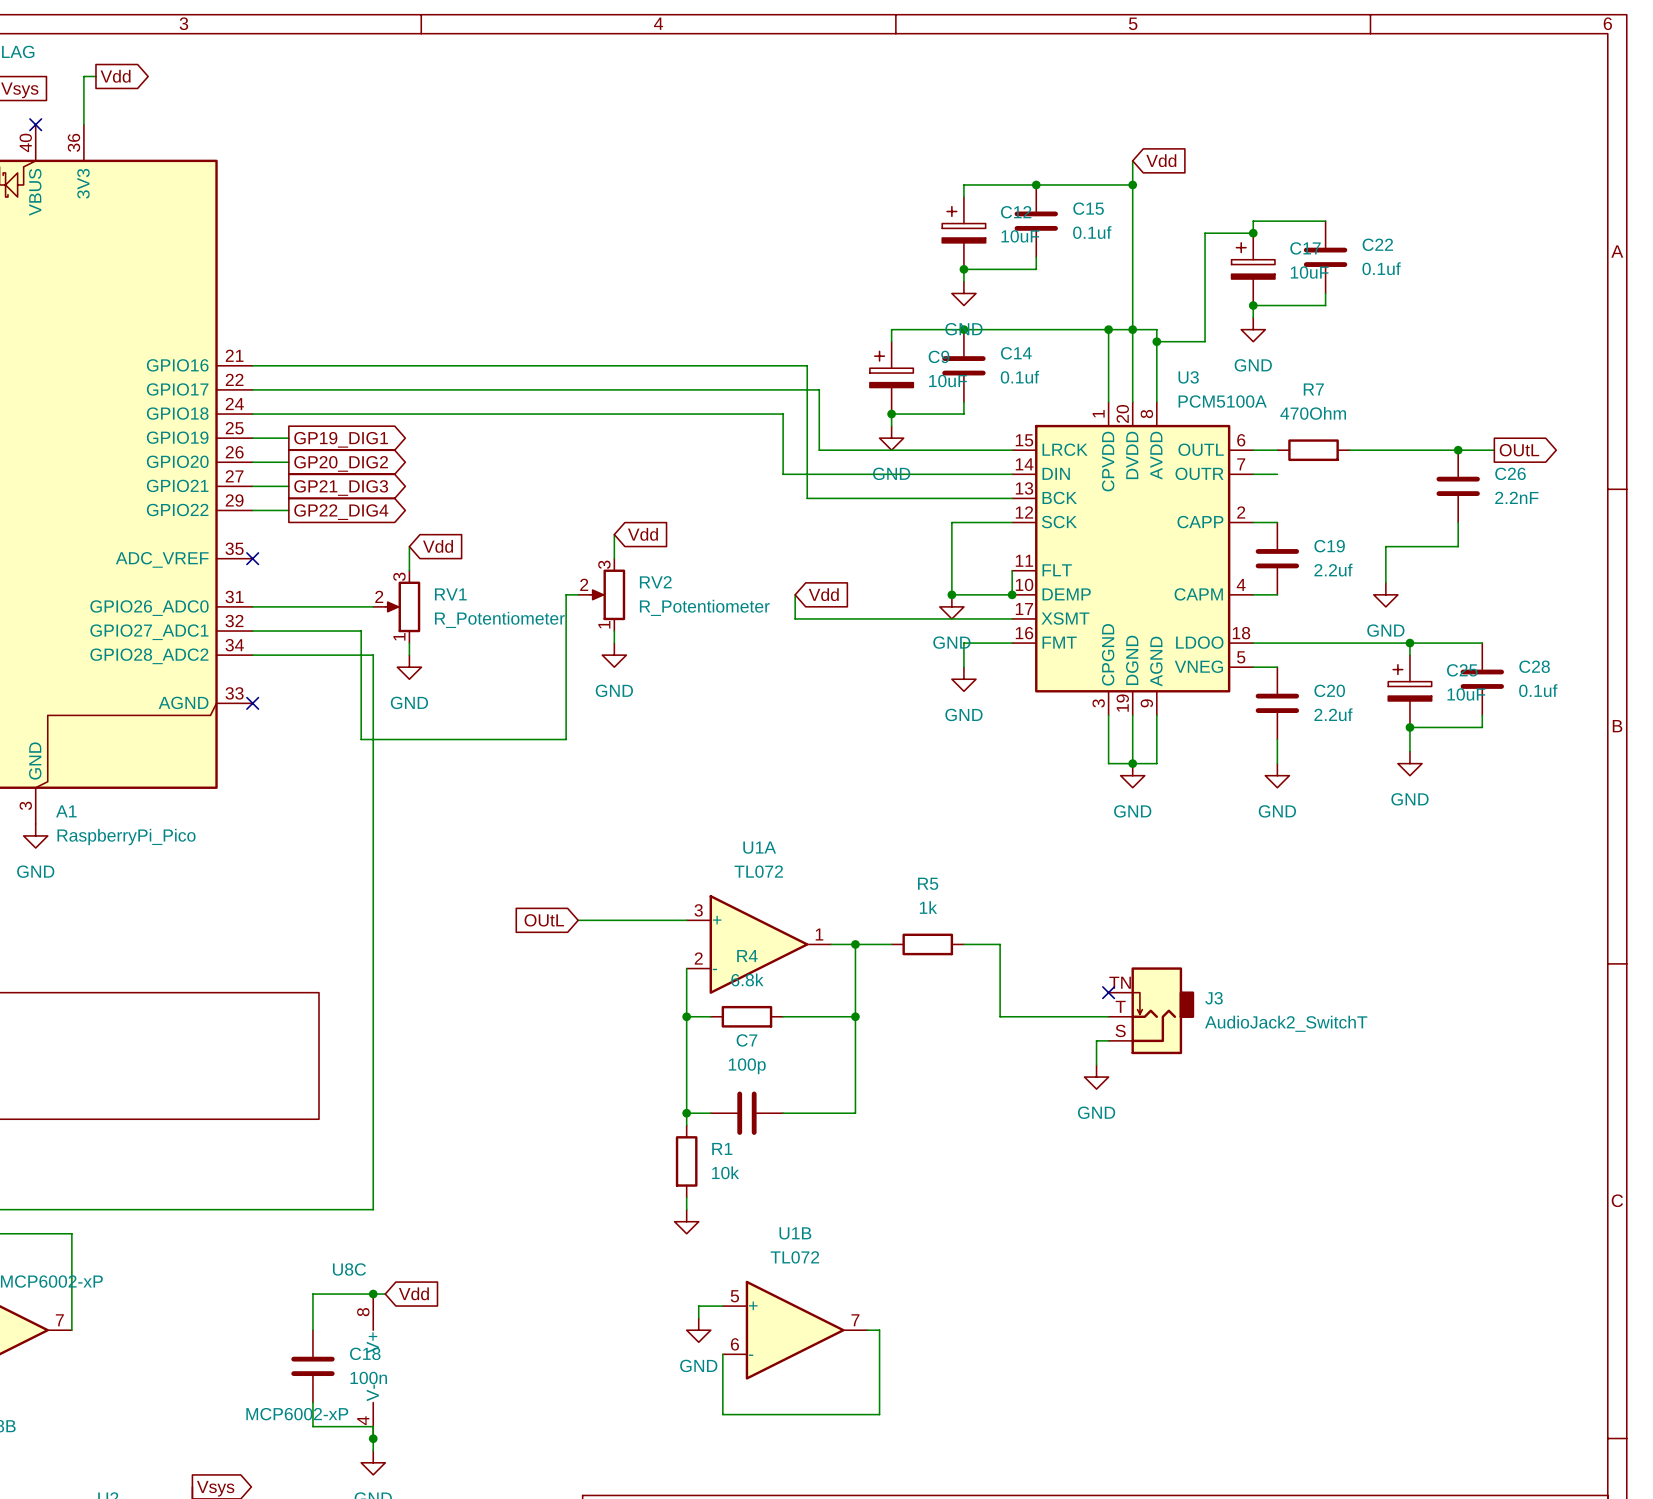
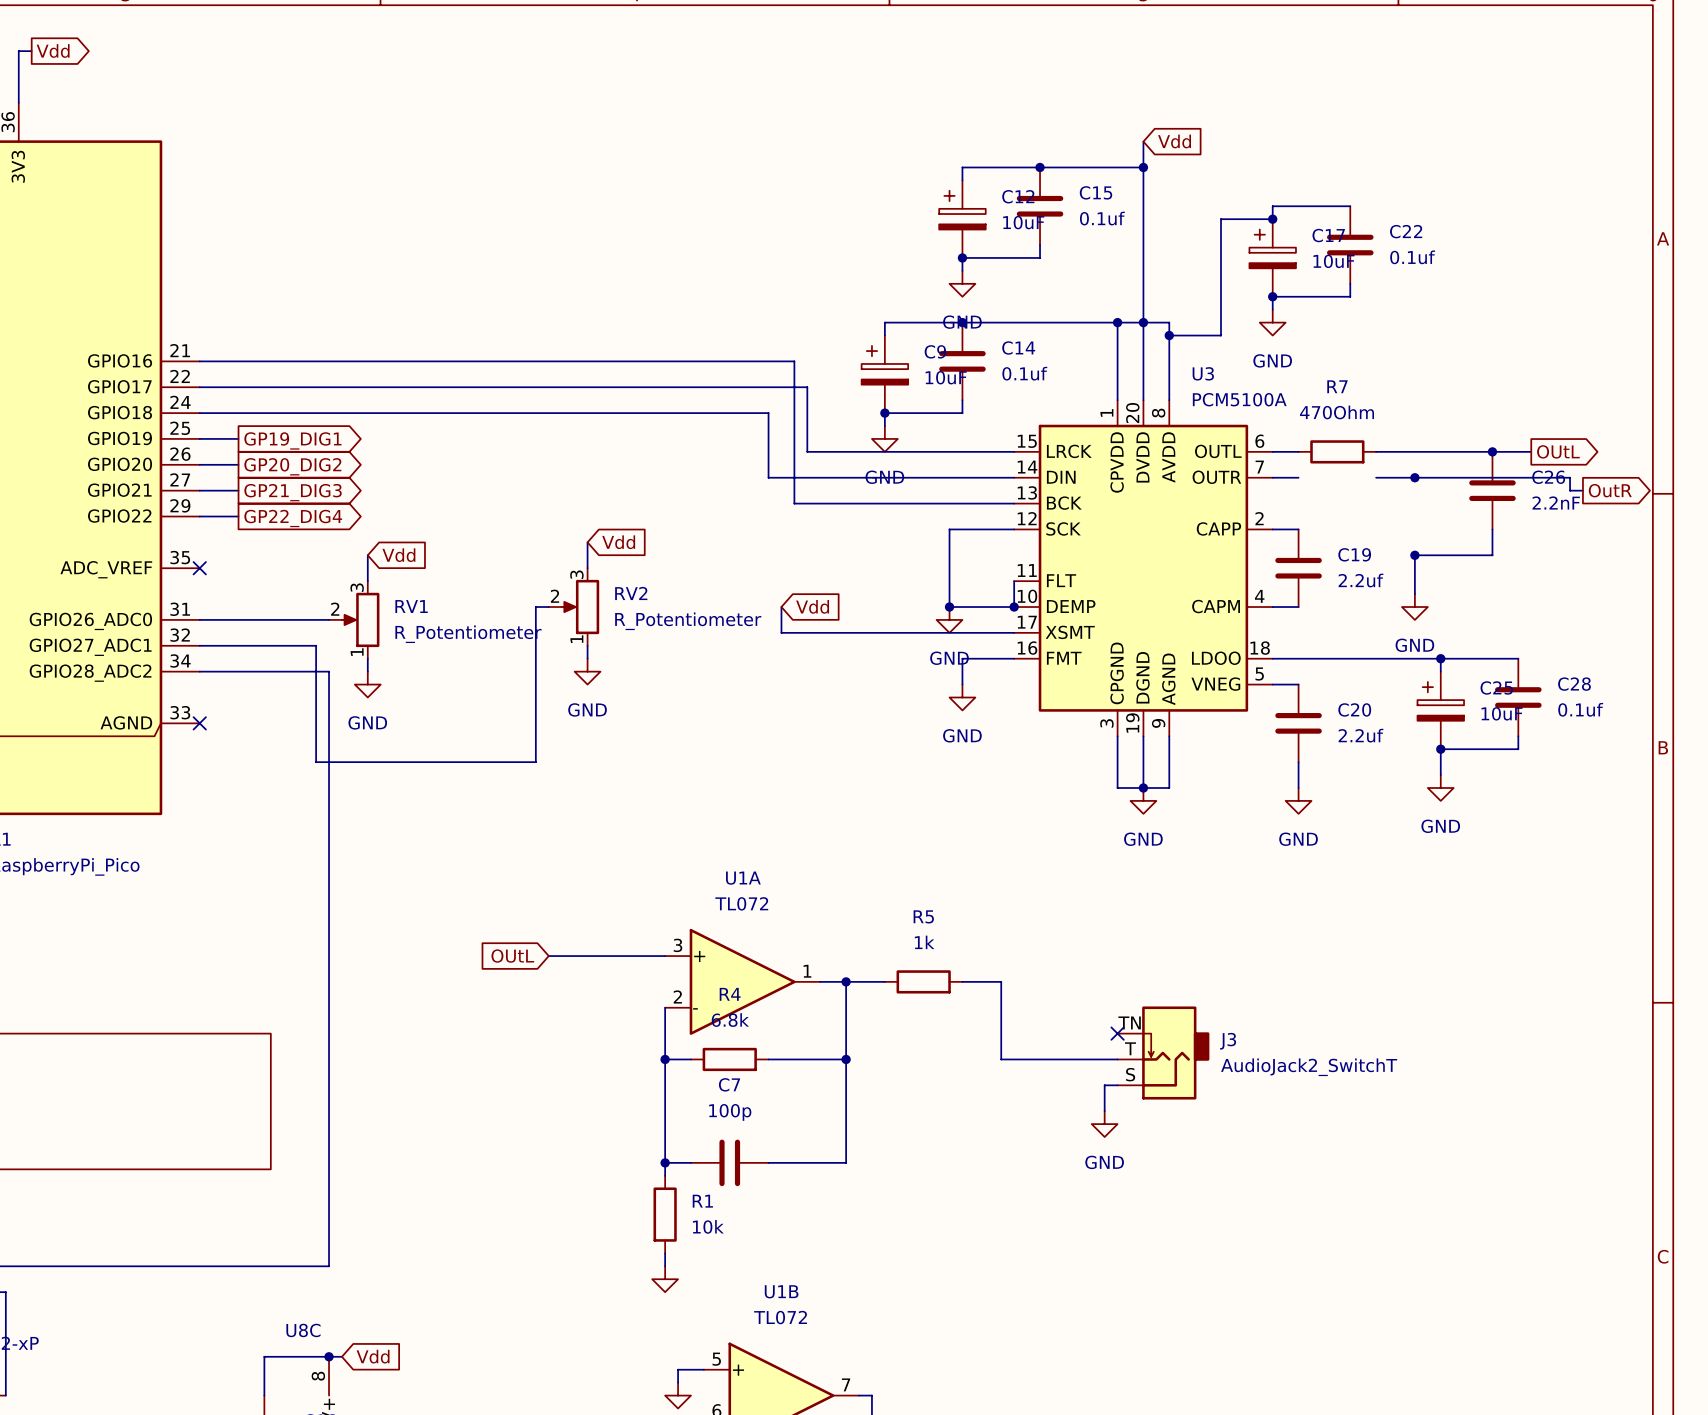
wire: none -> (1376, 477) (1570, 477) (1570, 490) (1582, 490)
junction: none -> (1414, 477)
global label: none -> OutR (1610, 490)
junction: none -> (1414, 555)

